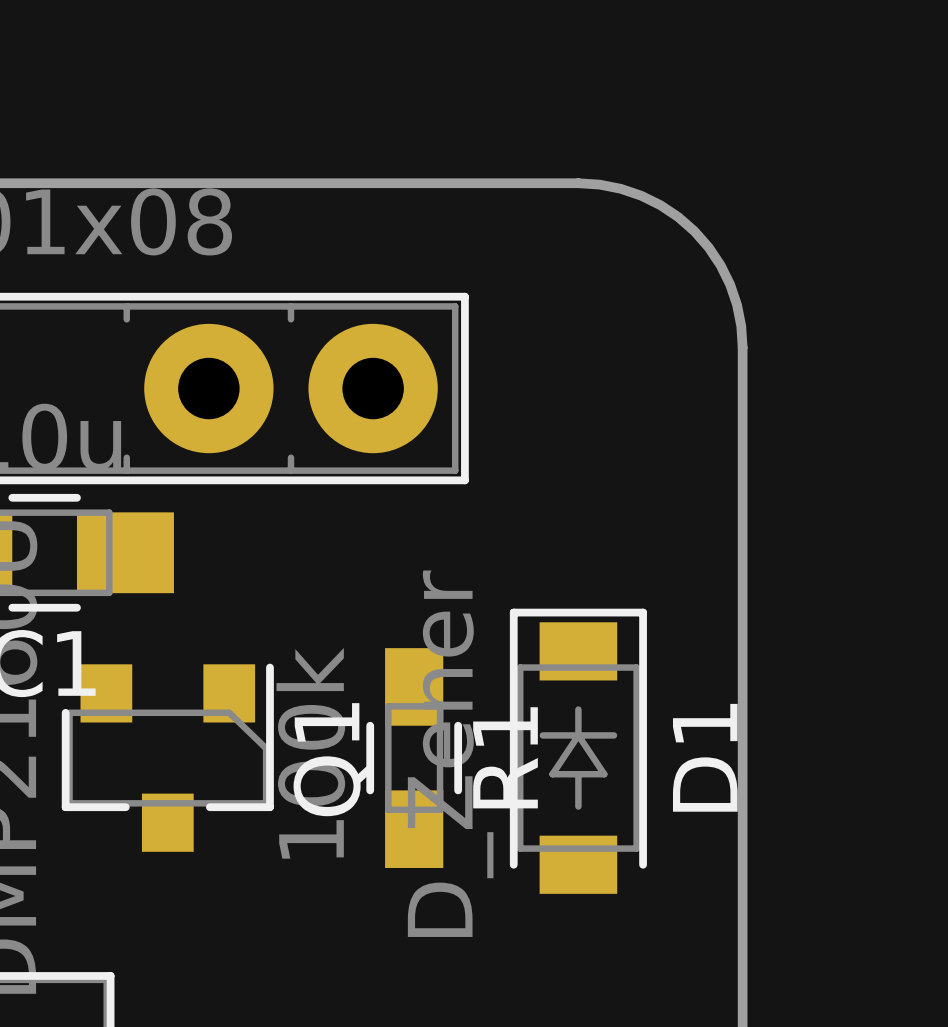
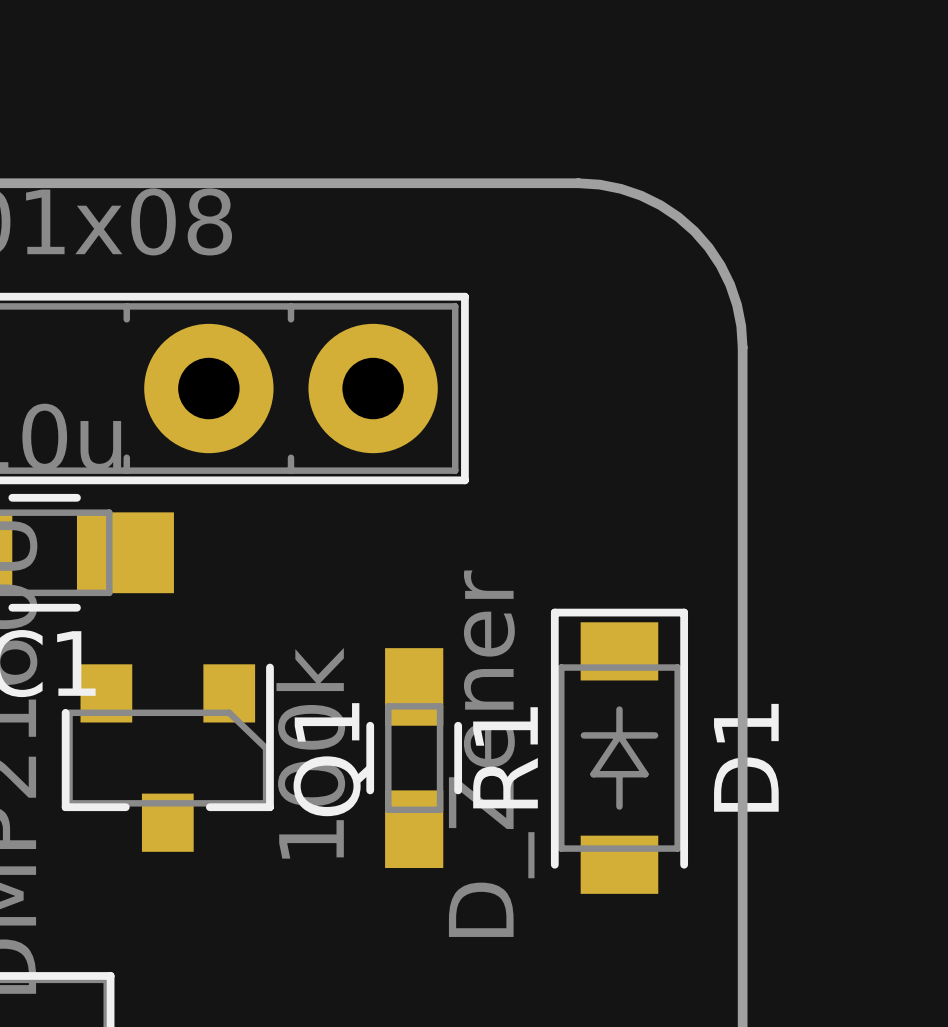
D1 position: (578, 751) -> (619, 751)

